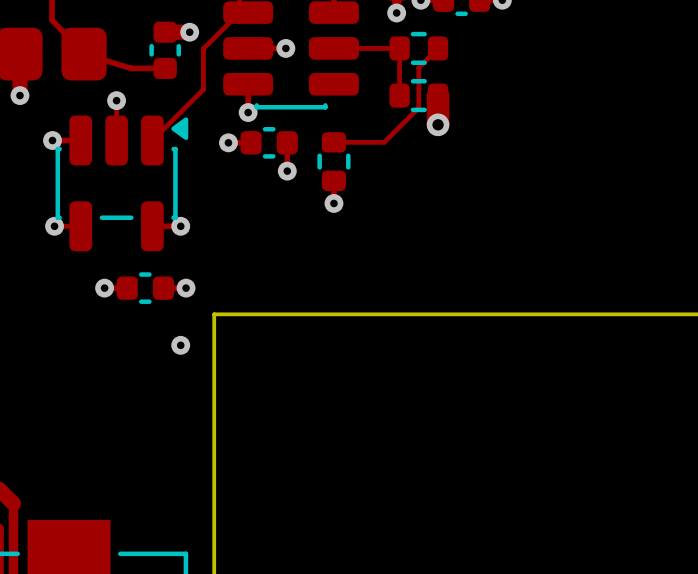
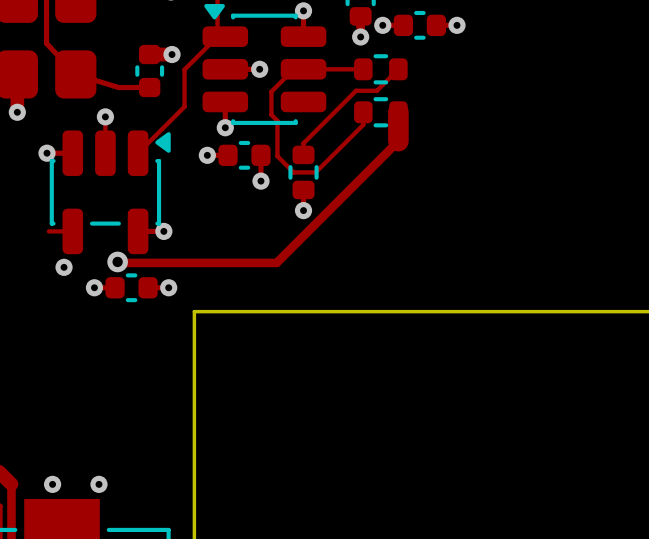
track: (399, 48) (399, 95) -> (303, 69) (293, 69) (271, 91) (271, 114) (277, 120) (277, 156) (293, 172) (315, 172) (363, 124) (363, 112)
track: (418, 67) (418, 107) (384, 142) (333, 142) -> (380, 86) (376, 90) (356, 90) (303, 143) (303, 154)
track: none -> (398, 138) (398, 141) (276, 262) (117, 261)
via: (438, 124) -> none
via position: (54, 226) -> (64, 267)
via: none -> (117, 261)
via: (180, 345) -> none
via: none -> (52, 484)
via: none -> (98, 484)

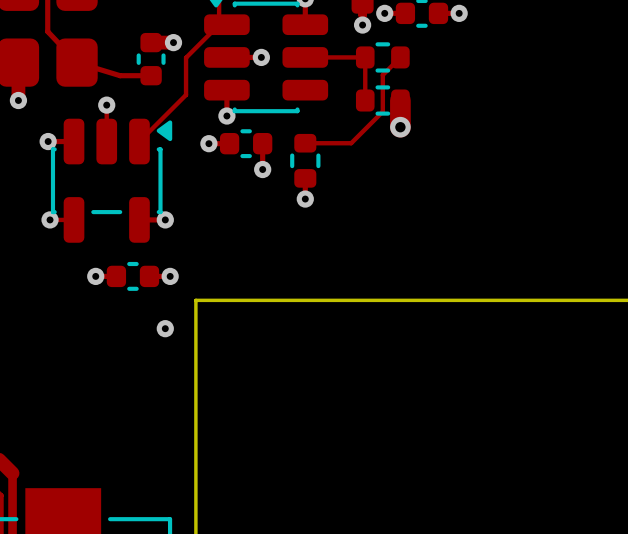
track: (303, 69) (293, 69) (271, 91) (271, 114) (277, 120) (277, 156) (293, 172) (315, 172) (363, 124) (363, 112) -> (365, 57) (365, 100)
track: (380, 86) (376, 90) (356, 90) (303, 143) (303, 154) -> (382, 75) (382, 111) (351, 143) (305, 143)
track: (398, 138) (398, 141) (276, 262) (117, 261) -> none
via: none -> (400, 127)
via: (117, 261) -> none
via position: (64, 267) -> (50, 219)
via: none -> (165, 328)
via: (52, 484) -> none
via: (98, 484) -> none

